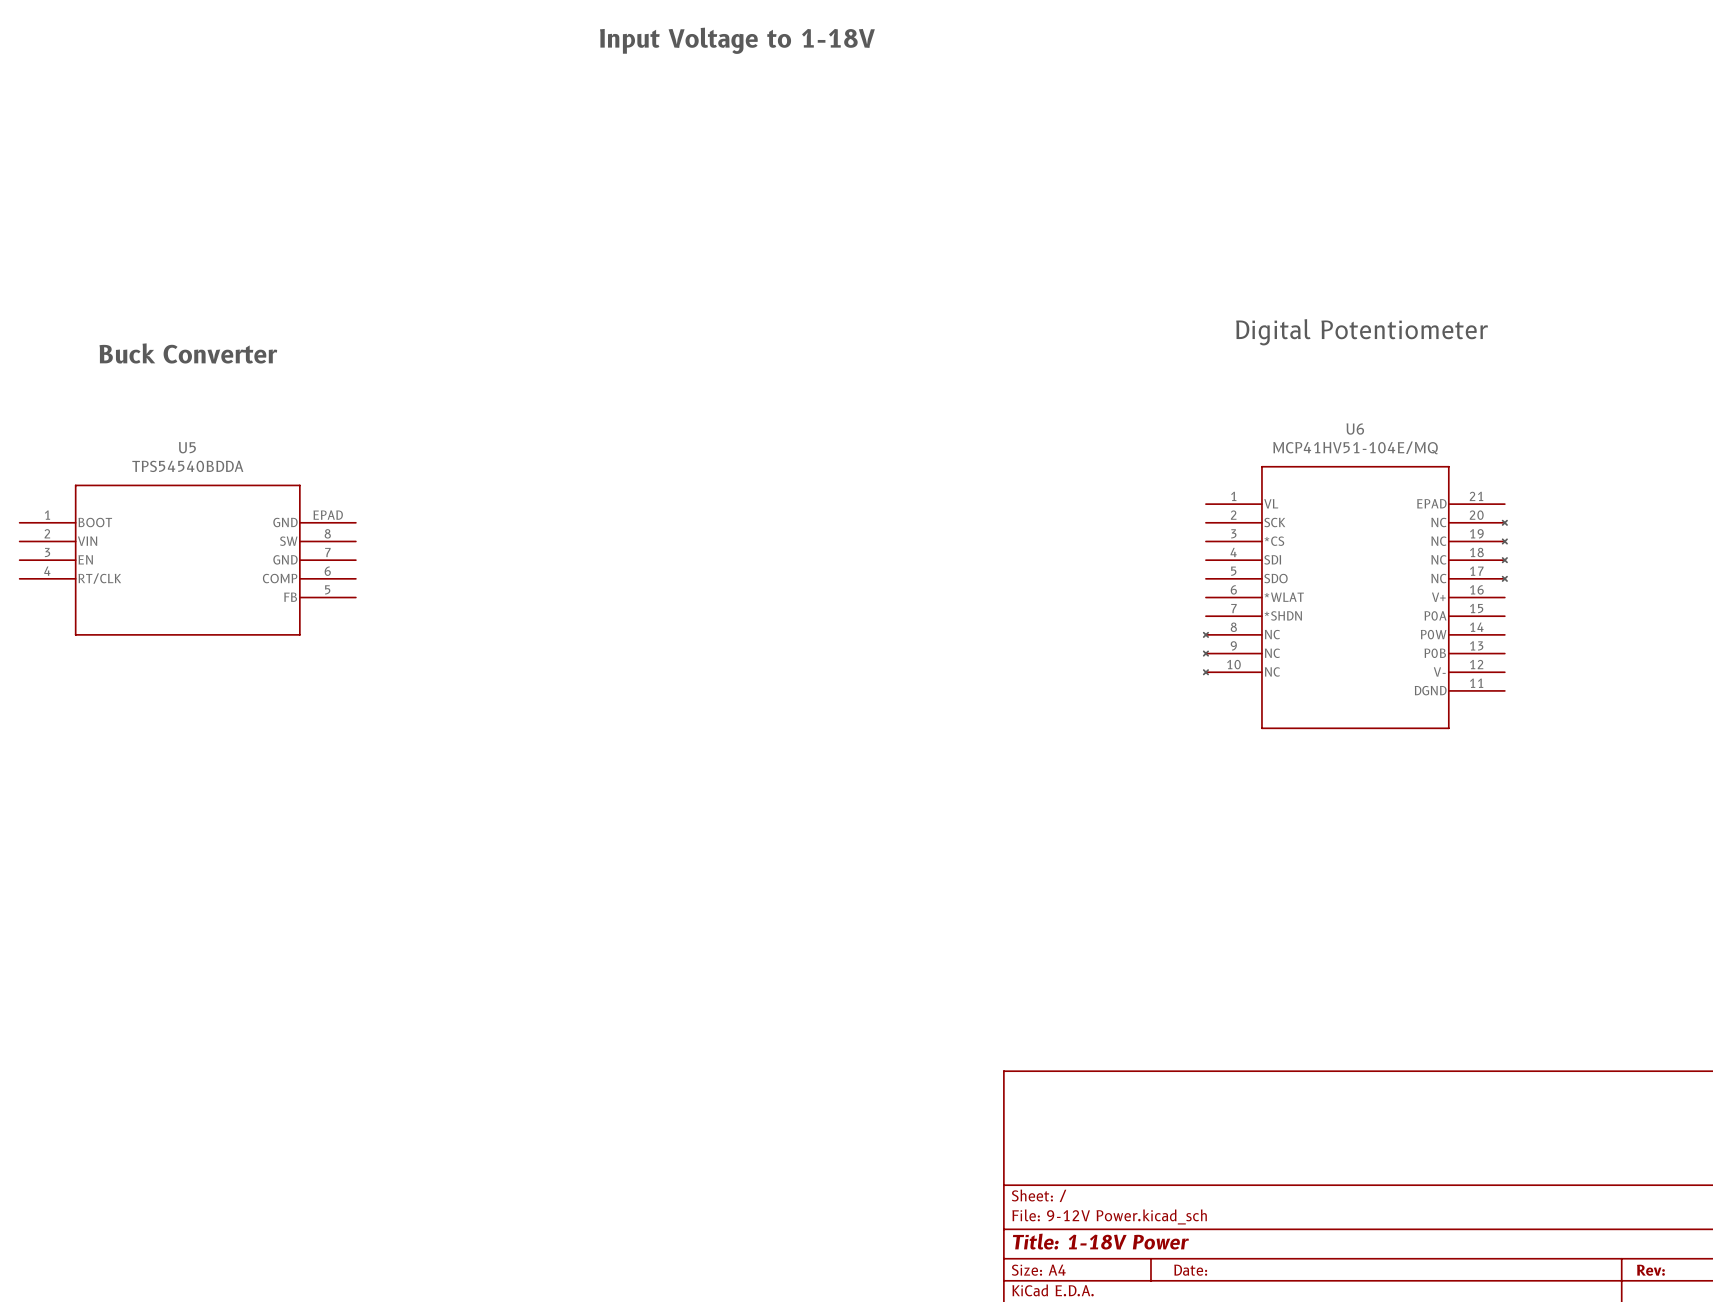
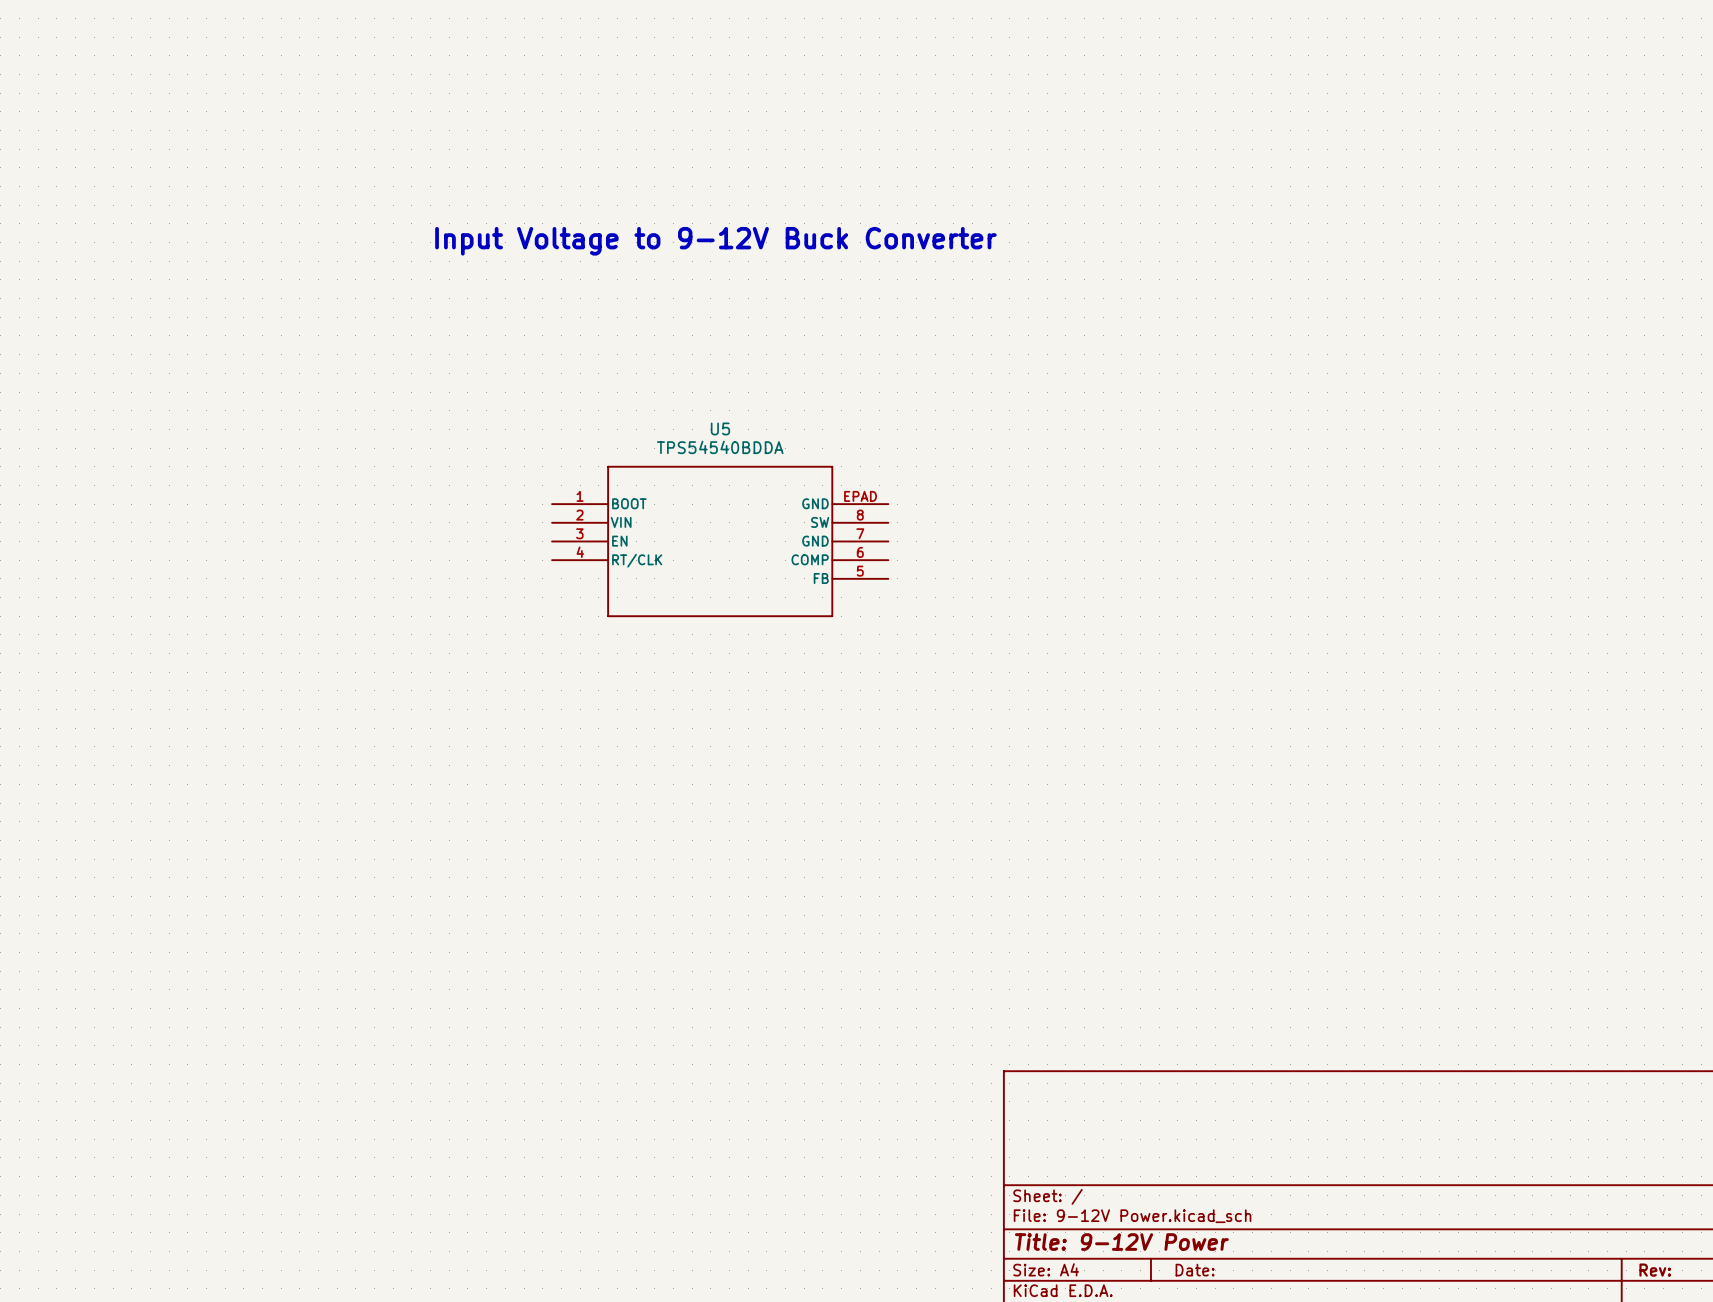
text: Input Voltage to 1-18V (737, 40) -> none
text: none -> Input Voltage to 9-12V Buck Converter (715, 241)
text: Digital Potentiometer (1362, 332) -> none
text: Buck Converter (188, 353) -> none
U5 position: (187, 560) -> (720, 541)
U6: MCP41HV51-104E/MQ (1355, 597) -> none
title block: Title: 1-18V Power (1100, 1241) -> Title: 9-12V Power (1121, 1242)

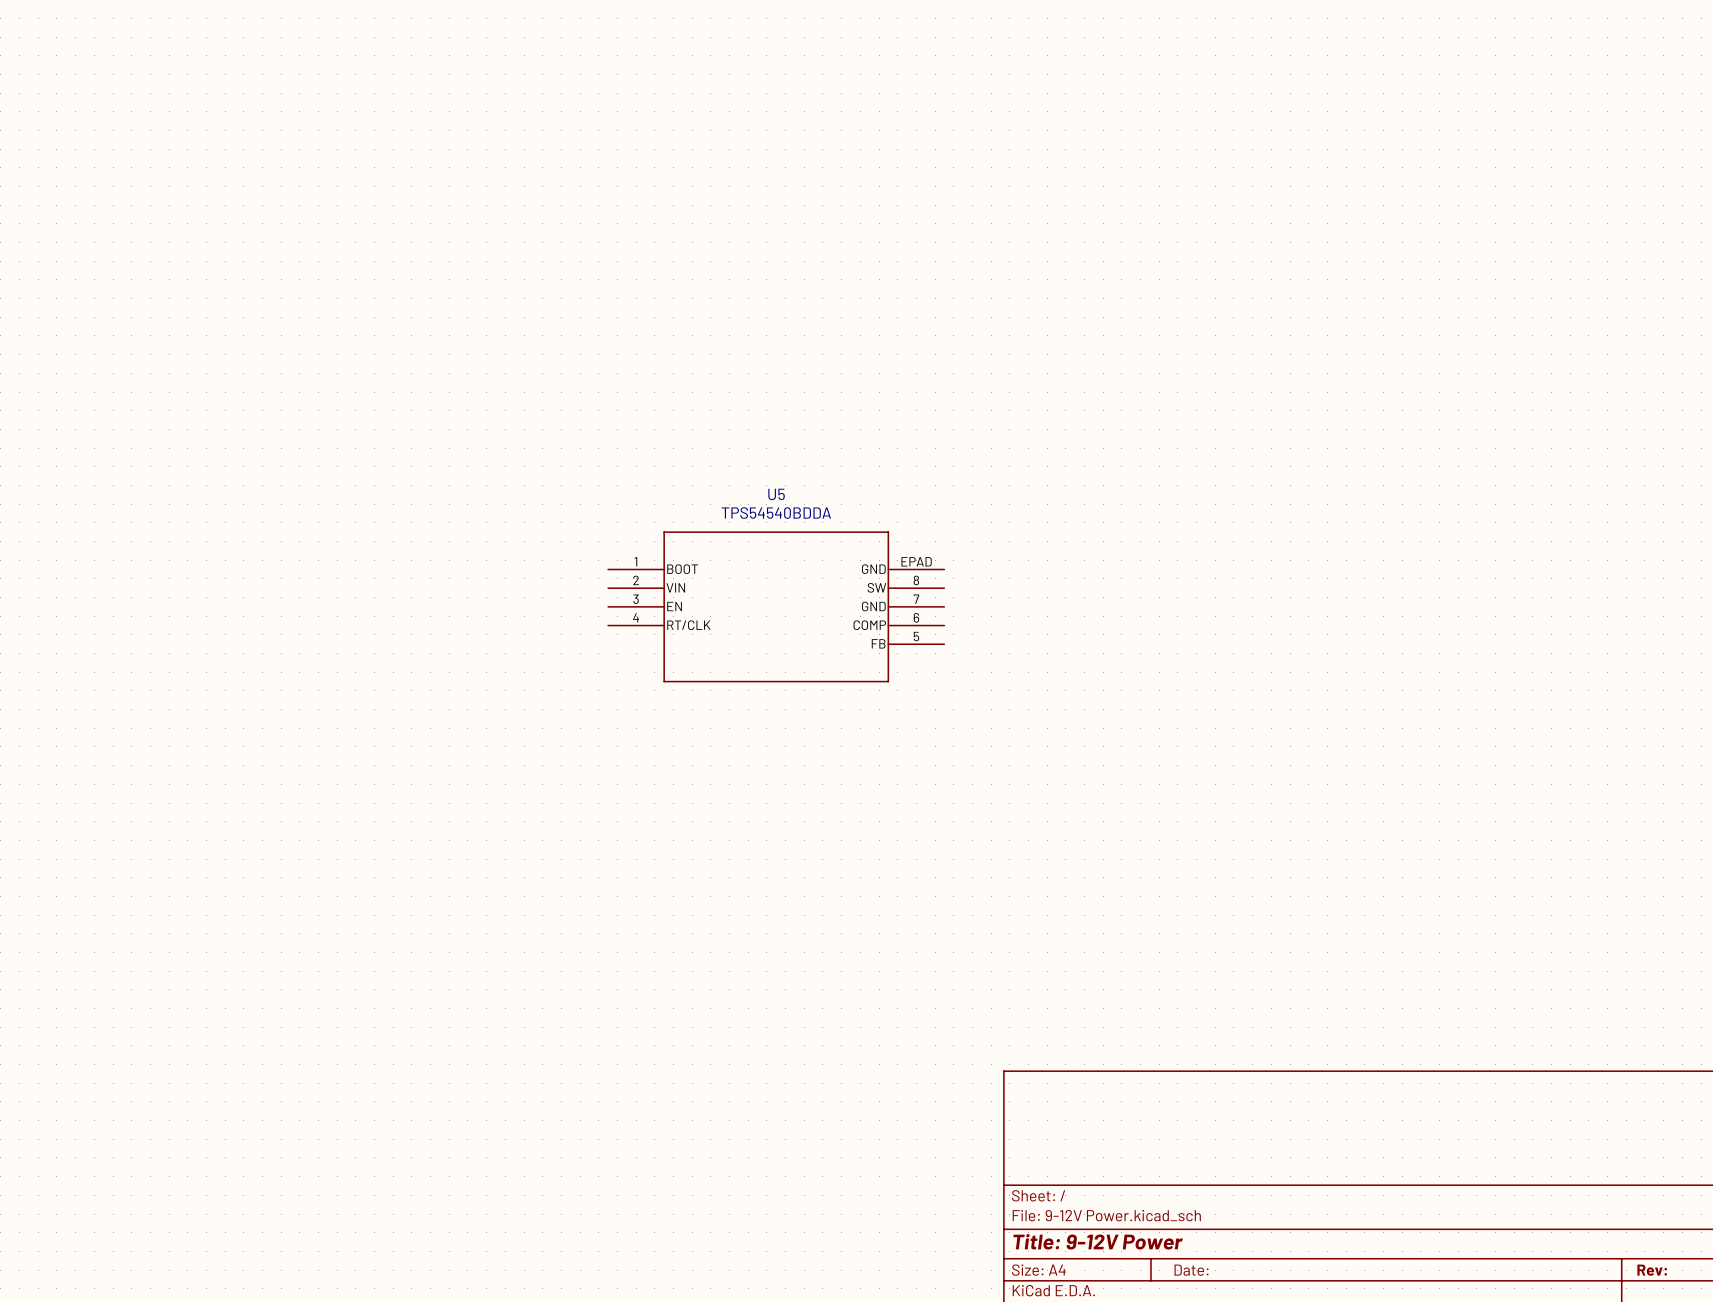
text: Input Voltage to 9-12V Buck Converter (715, 241) -> none
U5 position: (720, 541) -> (776, 606)

